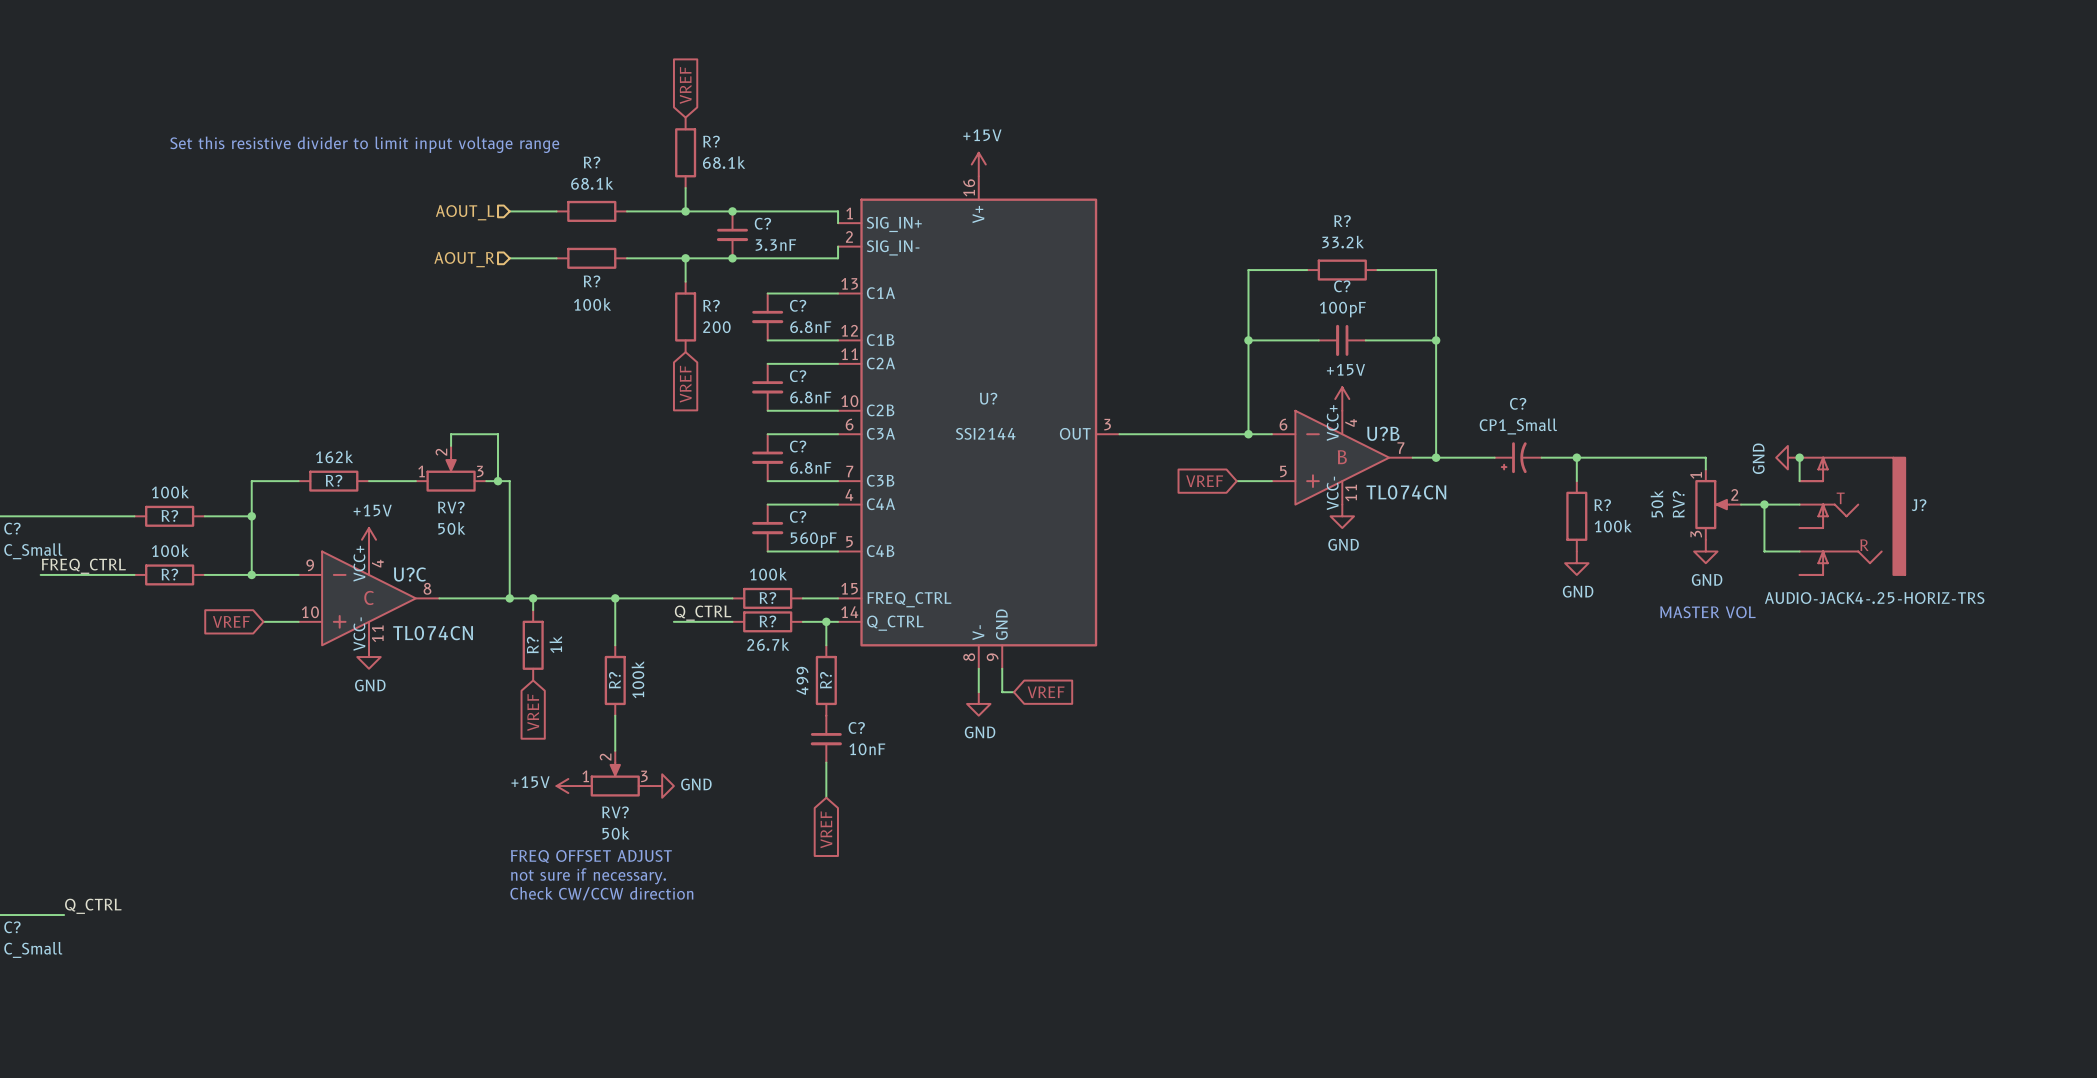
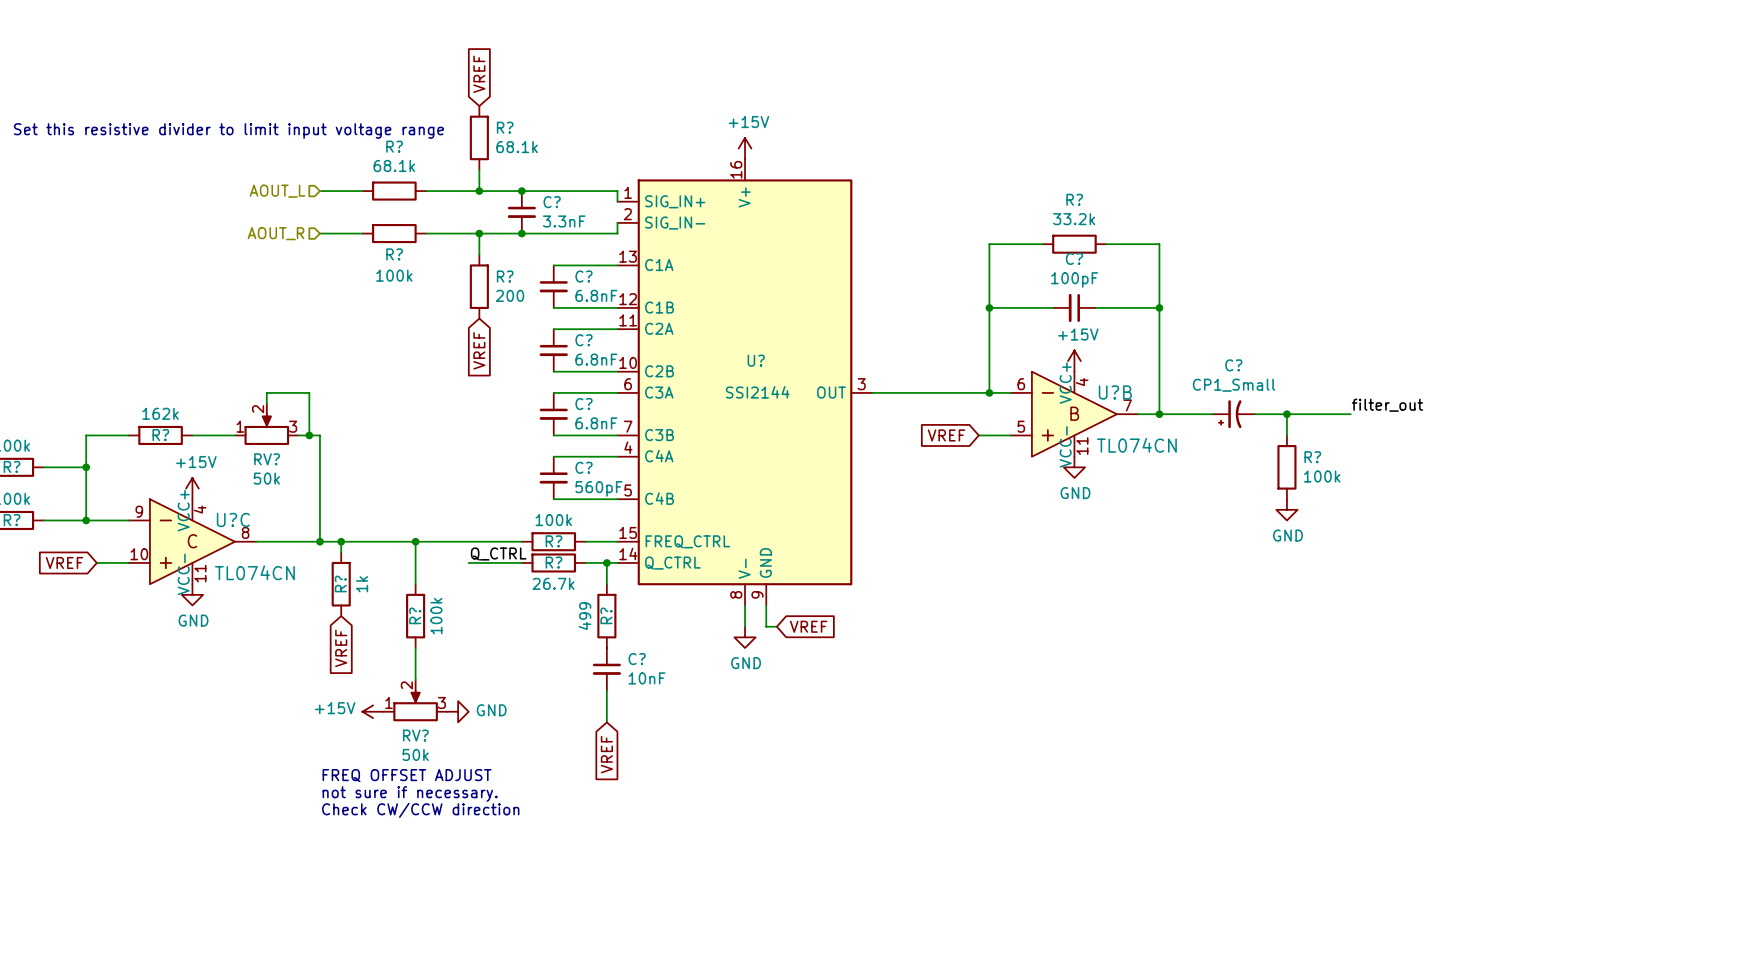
label: none -> filter_out (1387, 405)
wire: (1647, 457) (1705, 457) (1705, 469) -> none
power symbol: GND (1787, 457) -> none
wire: (1799, 457) (1799, 481) -> none
junction: (1799, 457) -> none
RV?: 50k (1718, 504) -> none
wire: (1740, 504) (1799, 504) -> none
wire: (1764, 504) (1764, 551) (1799, 551) -> none
junction: (1764, 504) -> none
J?: AUDIO-JACK4-.25-HORIZ-TRS (1852, 516) -> none
power symbol: GND (1705, 551) -> none
text: MASTER VOL (1707, 612) -> none

